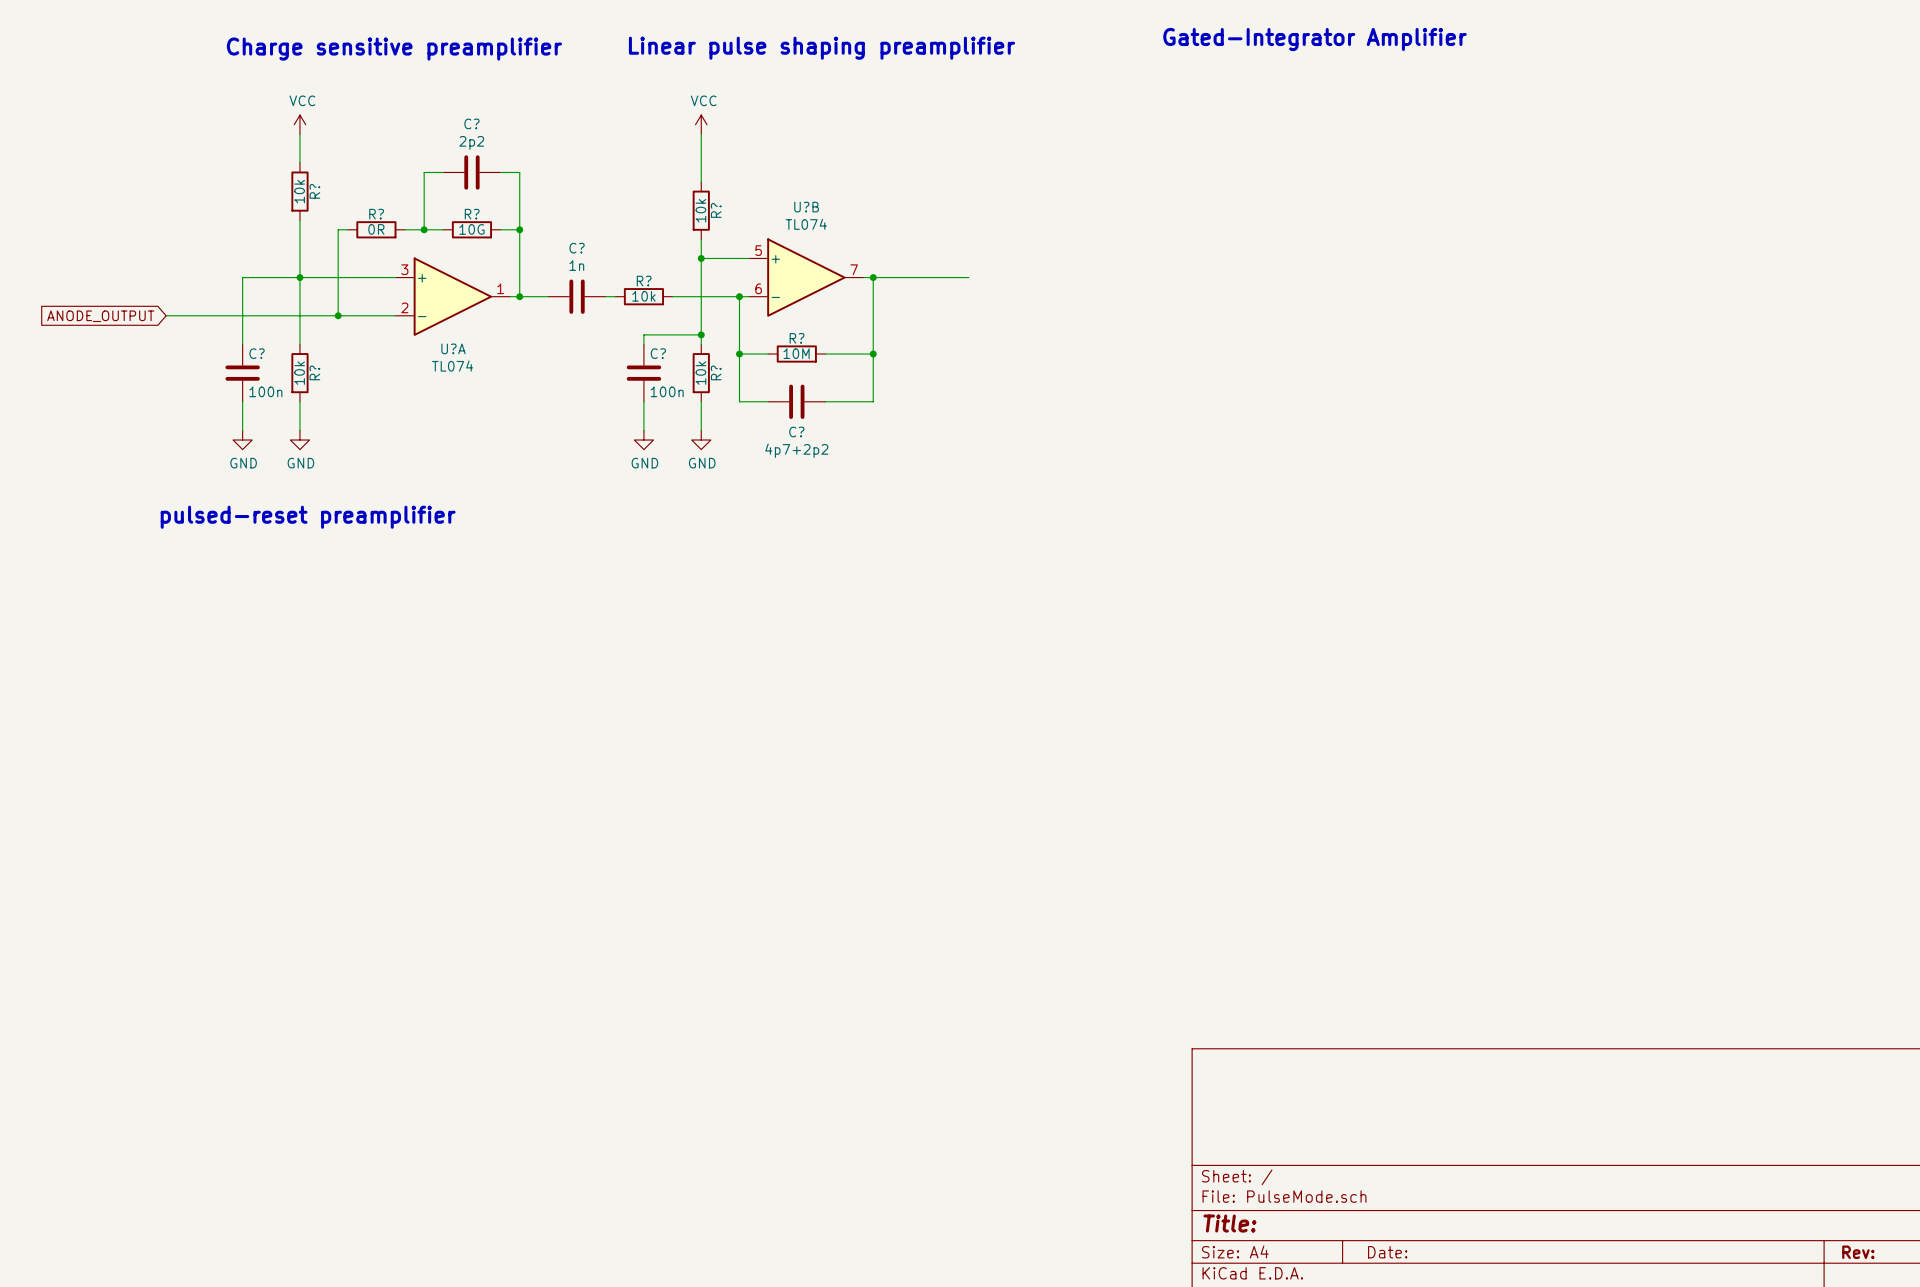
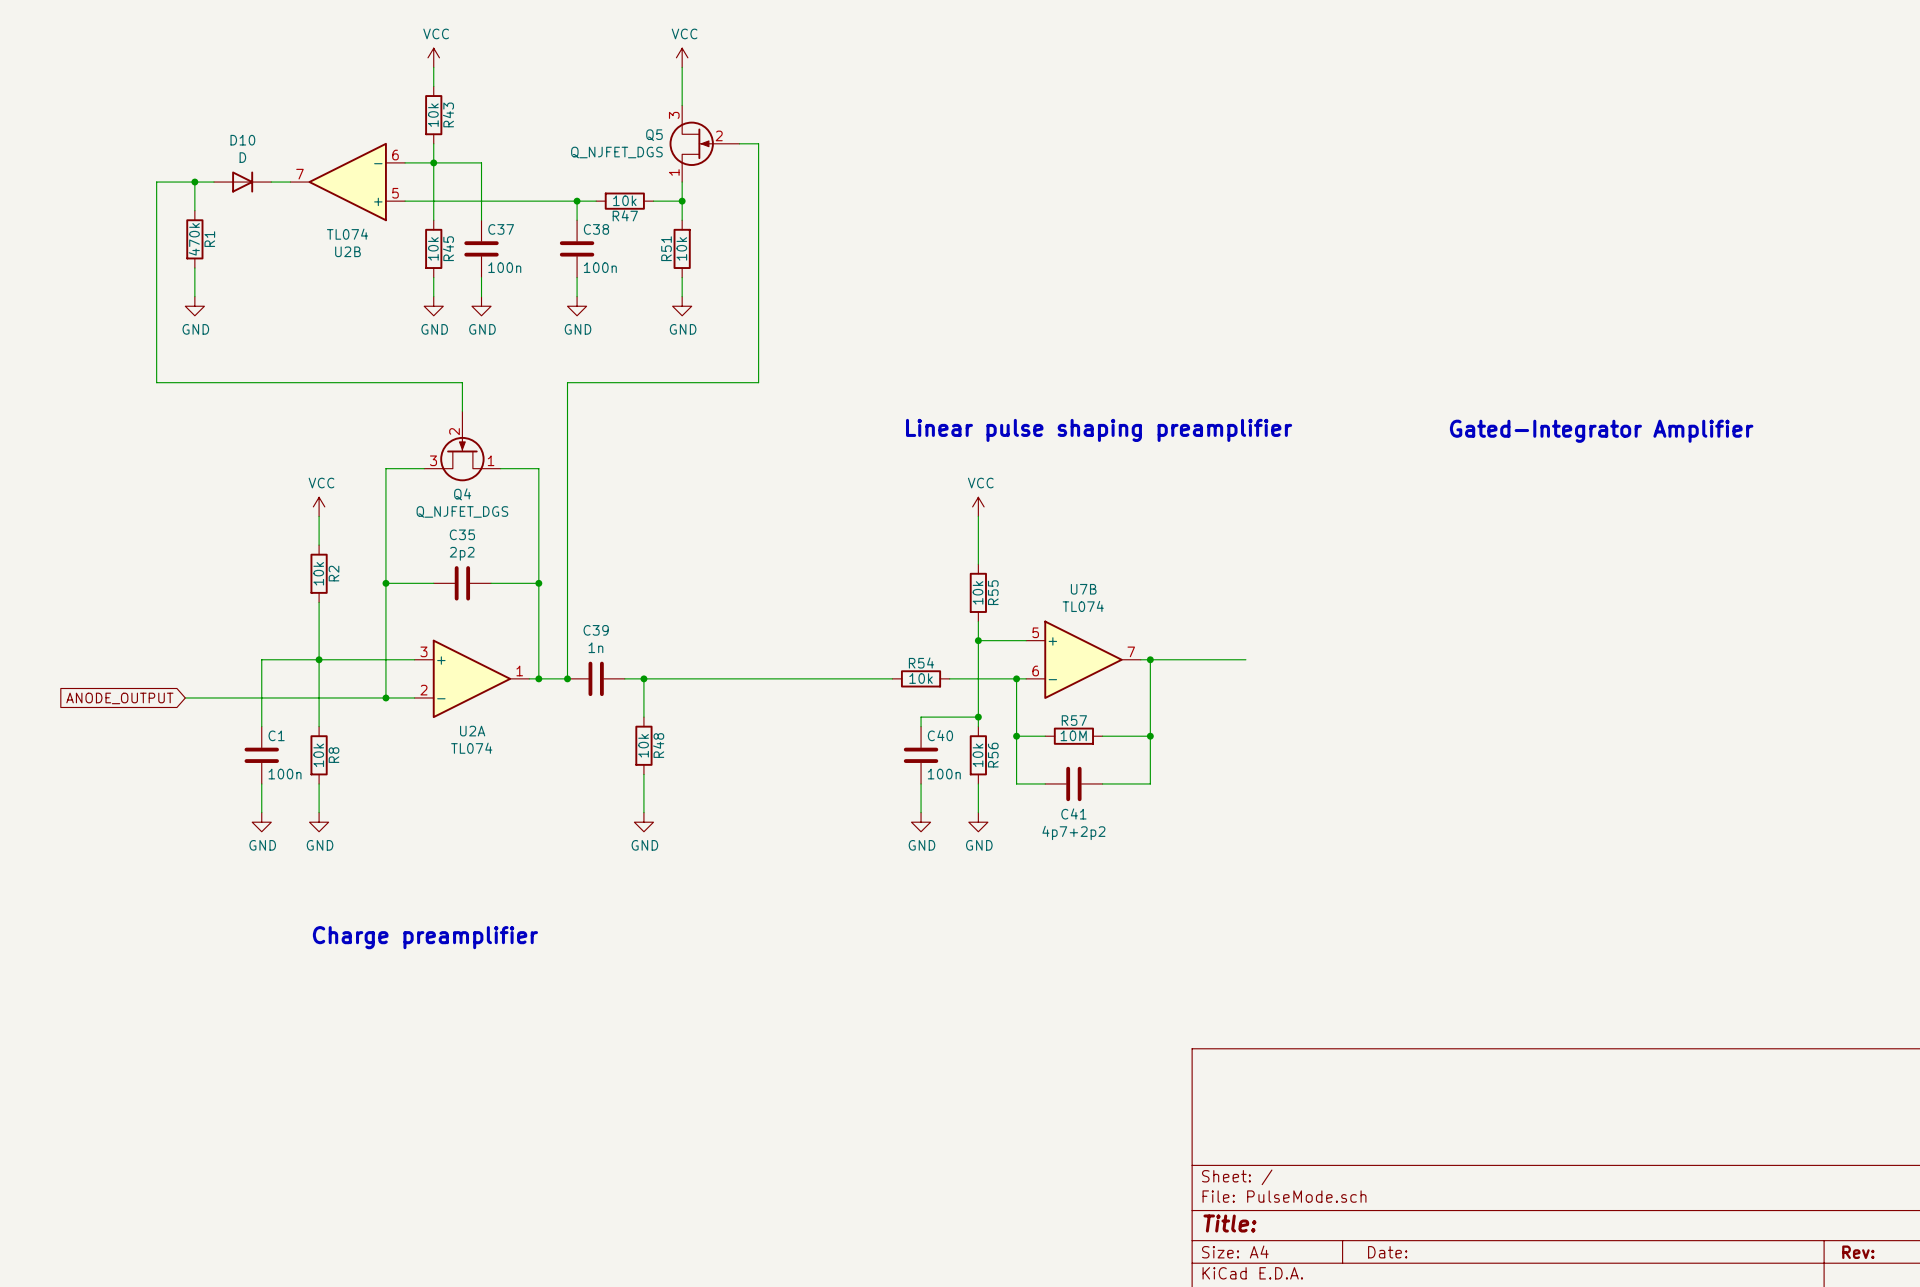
text: Gated-Integrator Amplifier (1315, 39) -> none
text: Linear pulse shaping preamplifier (821, 48) -> none
text: Charge sensitive preamplifier (394, 49) -> none
power symbol: none -> VCC (433, 57)
wire: none -> (433, 67) (433, 86)
wire: none -> (682, 67) (682, 105)
R43: none -> 10k (433, 115)
power symbol: VCC (299, 124) -> none
power symbol position: VCC (701, 124) -> VCC (682, 57)
wire: (299, 134) (299, 162) -> (194, 182) (194, 210)
wire: (701, 134) (701, 182) -> none
wire: none -> (433, 143) (433, 220)
Q5: none -> Q_NJFET_DGS (704, 143)
wire: none -> (739, 143) (758, 143) (758, 382) (567, 382) (567, 678) (529, 678)
wire: none -> (405, 162) (481, 162) (481, 220)
junction: none -> (433, 162)
wire: (443, 172) (424, 172) (424, 229) -> none
C?: 2p2 (471, 172) -> none
wire: (500, 172) (519, 172) (519, 296) -> none
junction: none -> (194, 182)
wire: none -> (213, 182) (156, 182) (156, 382) (462, 382) (462, 411)
D10: none -> D (242, 182)
wire: none -> (271, 182) (290, 182)
U2B: none -> TL074 (347, 182)
wire: none -> (682, 182) (682, 220)
R?: 10k (299, 191) -> none
wire: none -> (405, 201) (596, 201)
wire: none -> (577, 201) (577, 220)
junction: none -> (577, 201)
R47: none -> 10k (624, 201)
junction: none -> (682, 201)
R?: 10k (701, 210) -> none
wire: (299, 220) (299, 344) -> none
wire: (347, 229) (338, 229) (338, 315) -> none
R?: 0R (376, 229) -> none
wire: (405, 229) (443, 229) -> none
junction: (424, 229) -> none
R?: 10G (471, 229) -> none
wire: (500, 229) (519, 229) -> none
junction: (519, 229) -> none
R1: none -> 470k (194, 239)
wire: (701, 239) (701, 344) -> none
R45: none -> 10k (433, 248)
C37: none -> 100n (481, 248)
C38: none -> 100n (577, 248)
R51: none -> 10k (682, 248)
wire: (701, 258) (749, 258) -> none
junction: (701, 258) -> none
junction: (299, 277) -> none
wire: (395, 277) (242, 277) (242, 344) -> none
wire: none -> (481, 277) (481, 296)
wire: none -> (577, 277) (577, 296)
wire: none -> (682, 277) (682, 296)
U?B: TL074 (806, 277) -> none
wire: (863, 277) (968, 277) -> none
wire: (873, 277) (873, 401) (825, 401) -> none
junction: (873, 277) -> none
U?A: TL074 (452, 296) -> none
wire: (510, 296) (548, 296) -> none
junction: (519, 296) -> none
C?: 1n (577, 296) -> none
wire: (605, 296) (615, 296) -> none
R?: 10k (643, 296) -> none
wire: (672, 296) (749, 296) -> none
wire: (739, 296) (739, 401) (768, 401) -> none
junction: (739, 296) -> none
power symbol: none -> GND (194, 306)
power symbol: none -> GND (433, 306)
power symbol: none -> GND (481, 306)
power symbol: none -> GND (577, 306)
power symbol: none -> GND (682, 306)
wire: (166, 315) (395, 315) -> none
junction: (338, 315) -> none
global label: ANODE_OUTPUT (100, 316) -> none
wire: (701, 334) (643, 334) (643, 344) -> none
junction: (701, 334) -> none
wire: (739, 354) (768, 354) -> (653, 201) (682, 201)
junction: (739, 354) -> none
R?: 10M (796, 354) -> none
wire: (825, 354) (873, 354) -> none
junction: (873, 354) -> none
C?: 100n (242, 373) -> none
R?: 10k (299, 373) -> none
C?: 100n (643, 373) -> none
R?: 10k (701, 373) -> none
wire: (242, 401) (242, 430) -> (194, 268) (194, 296)
wire: (299, 401) (299, 430) -> (319, 516) (319, 545)
wire: (643, 401) (643, 430) -> none
wire: (701, 401) (701, 430) -> none
C?: 4p7+2p2 (796, 401) -> none
text: none -> Linear pulse shaping preamplifier (1099, 430)
text: none -> Gated-Integrator Amplifier (1601, 431)
power symbol: GND (242, 440) -> none
power symbol: GND (299, 440) -> none
power symbol: GND (643, 440) -> none
power symbol: GND (701, 440) -> none
Q4: none -> Q_NJFET_DGS (462, 446)
wire: none -> (424, 468) (385, 468) (385, 697)
wire: none -> (500, 468) (538, 468) (538, 678)
power symbol: none -> VCC (319, 506)
power symbol: none -> VCC (978, 506)
wire: none -> (978, 516) (978, 564)
text: pulsed-reset preamplifier (308, 517) -> none
R2: none -> 10k (319, 573)
wire: none -> (385, 583) (433, 583)
junction: none -> (385, 583)
C35: none -> 2p2 (462, 583)
wire: none -> (491, 583) (538, 583)
junction: none -> (538, 583)
R55: none -> 10k (978, 592)
wire: none -> (319, 602) (319, 726)
wire: none -> (978, 621) (978, 726)
wire: none -> (978, 640) (1026, 640)
junction: none -> (978, 640)
junction: none -> (319, 659)
wire: none -> (414, 659) (261, 659) (261, 726)
U7B: none -> TL074 (1083, 659)
wire: none -> (1140, 659) (1245, 659)
wire: none -> (1150, 659) (1150, 783) (1102, 783)
junction: none -> (1150, 659)
U2A: none -> TL074 (471, 678)
junction: none -> (538, 678)
junction: none -> (567, 678)
C39: none -> 1n (596, 678)
wire: none -> (624, 678) (892, 678)
wire: none -> (643, 678) (643, 717)
junction: none -> (643, 678)
R54: none -> 10k (921, 678)
wire: none -> (949, 678) (1026, 678)
wire: none -> (1016, 678) (1016, 783) (1045, 783)
junction: none -> (1016, 678)
wire: none -> (185, 697) (414, 697)
junction: none -> (385, 697)
global label: none -> ANODE_OUTPUT (119, 698)
wire: none -> (978, 717) (921, 717) (921, 726)
junction: none -> (978, 717)
wire: none -> (1016, 736) (1045, 736)
junction: none -> (1016, 736)
R57: none -> 10M (1073, 736)
wire: none -> (1102, 736) (1150, 736)
junction: none -> (1150, 736)
R48: none -> 10k (643, 745)
C1: none -> 100n (261, 755)
R8: none -> 10k (319, 755)
C40: none -> 100n (921, 755)
R56: none -> 10k (978, 755)
wire: none -> (643, 774) (643, 812)
wire: none -> (261, 783) (261, 812)
wire: none -> (319, 783) (319, 812)
wire: none -> (921, 783) (921, 812)
wire: none -> (978, 783) (978, 812)
C41: none -> 4p7+2p2 (1073, 783)
power symbol: none -> GND (261, 822)
power symbol: none -> GND (319, 822)
power symbol: none -> GND (643, 822)
power symbol: none -> GND (921, 822)
power symbol: none -> GND (978, 822)
text: none -> Charge preamplifier (425, 937)

